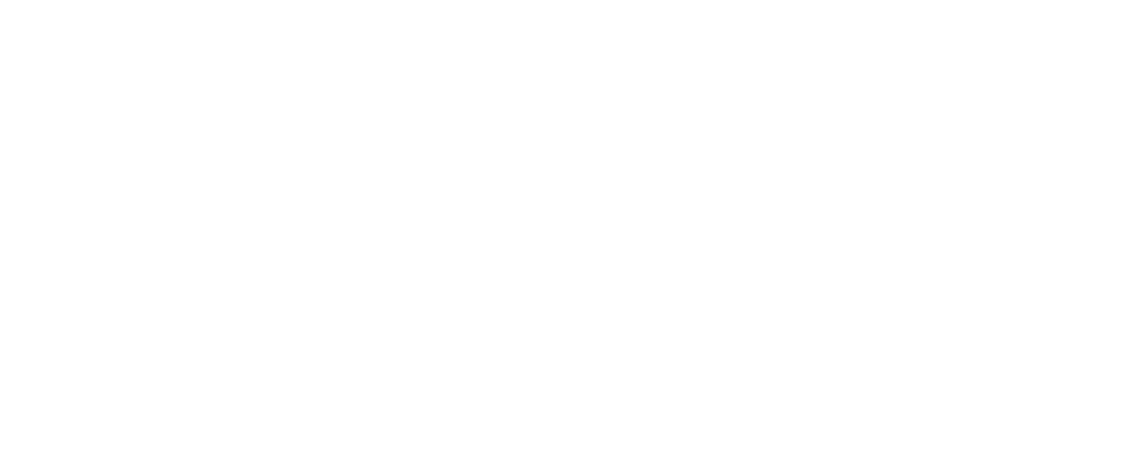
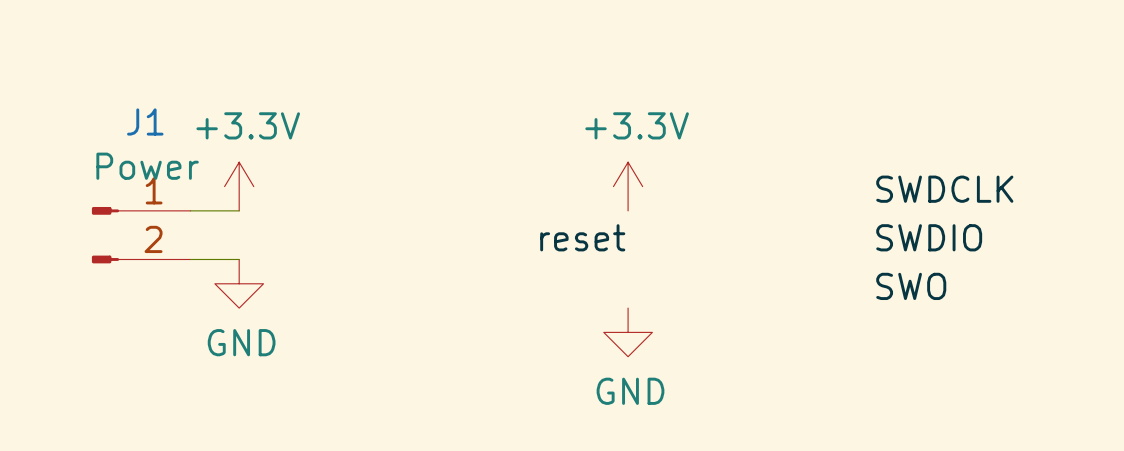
power symbol: none -> +3.3V (239, 186)
power symbol: none -> +3.3V (628, 186)
label: none -> SWDCLK (944, 189)
wire: none -> (190, 210) (239, 210)
J1: none -> Power (141, 235)
label: none -> reset (582, 237)
label: none -> SWDIO (929, 237)
wire: none -> (190, 259) (239, 259)
power symbol: none -> GND (239, 283)
label: none -> SWO (911, 286)
power symbol: none -> GND (628, 332)

